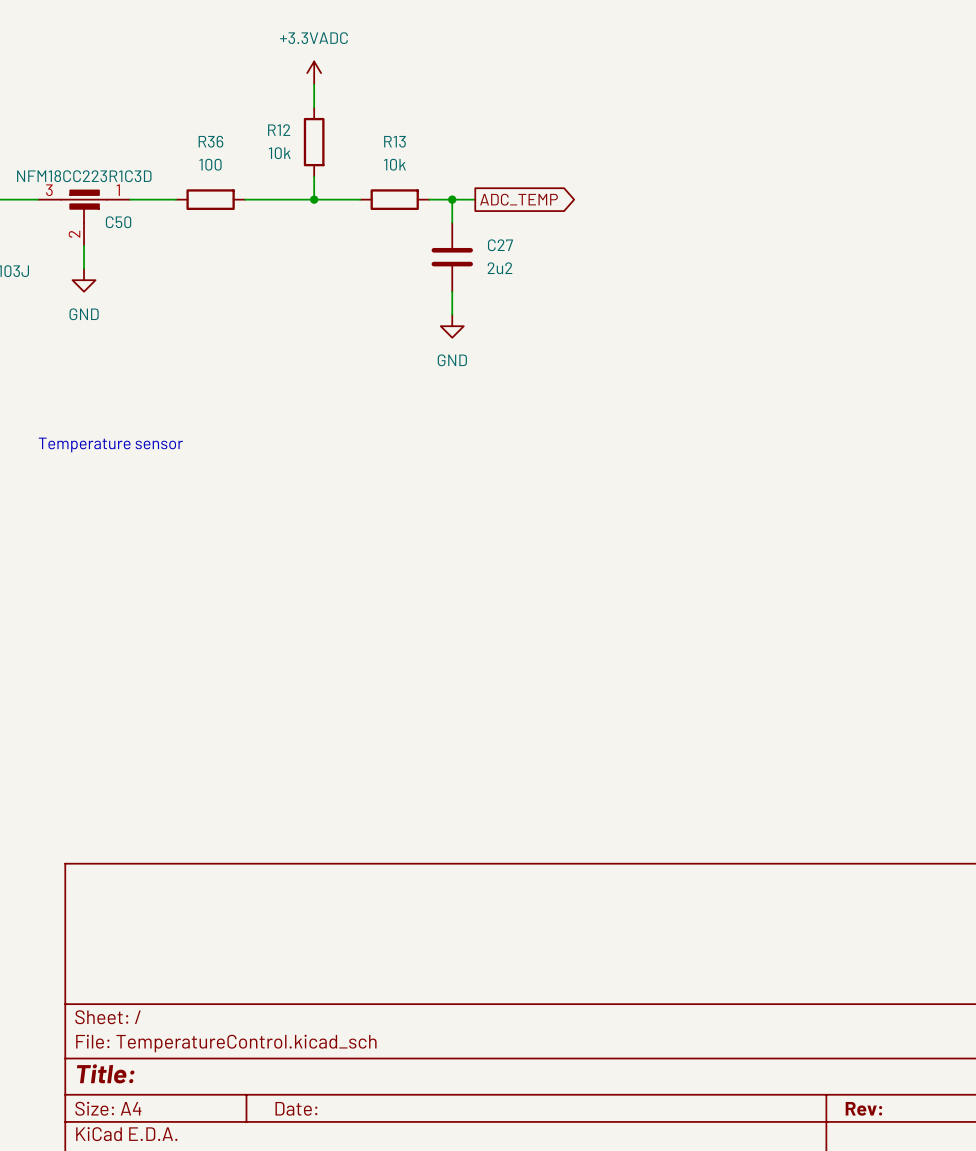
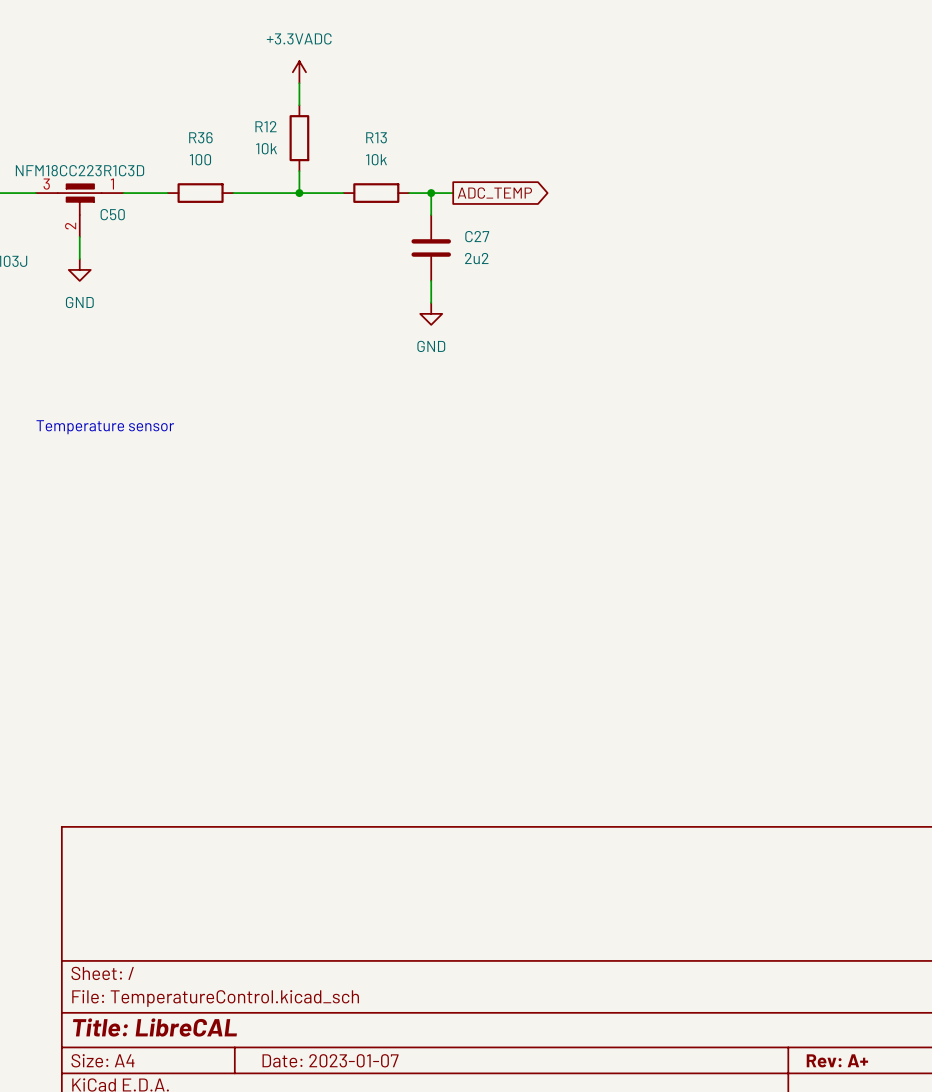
title block: Title: (105, 1073) -> Title: LibreCAL (154, 1027)
title block: Date: (296, 1108) -> Date: 2023-01-07 (330, 1060)
title block: Rev: (863, 1108) -> Rev: A+ (837, 1060)

